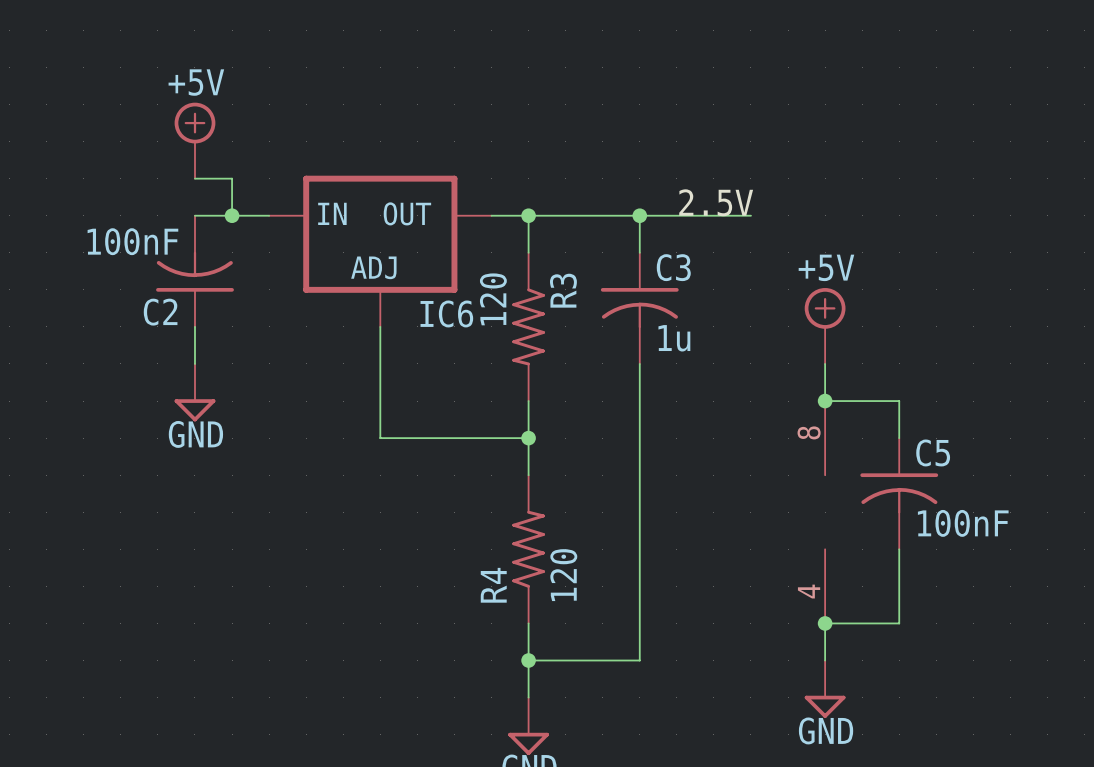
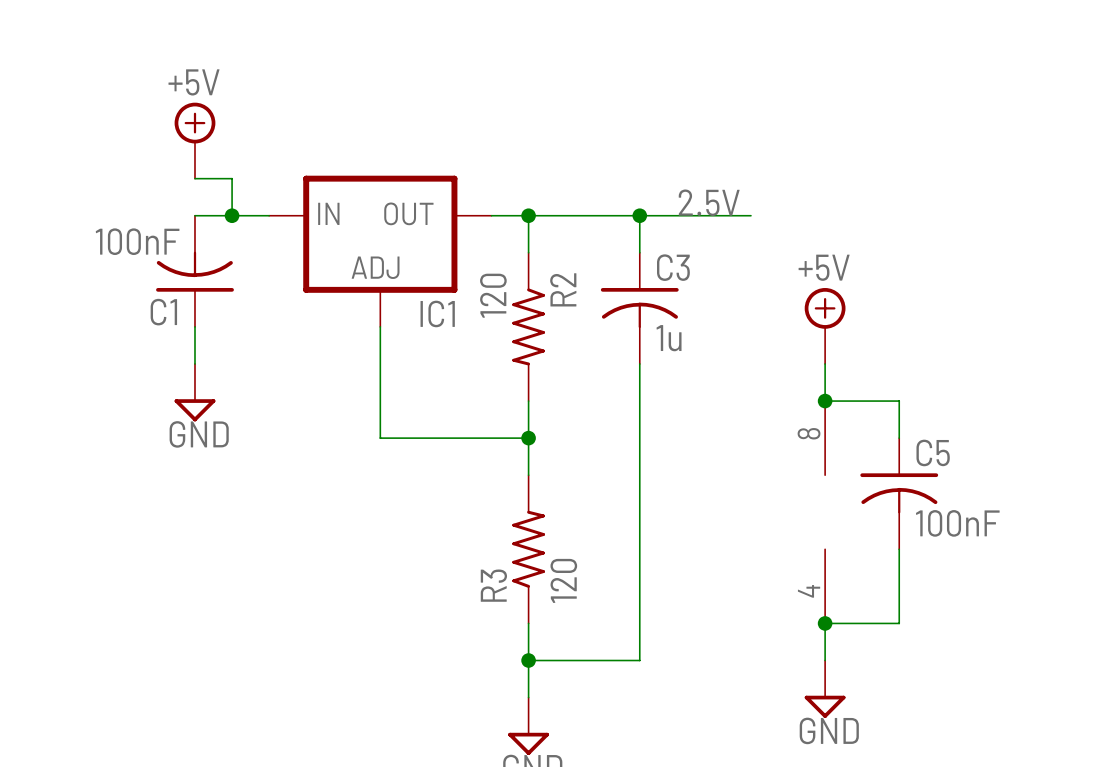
R3 name: R3 (563, 290) -> R2 (563, 289)
C2 name: C2 (160, 312) -> C1 (163, 312)
IC6 name: IC6 (446, 313) -> IC1 (437, 313)
R4 name: R4 (493, 585) -> R3 (493, 585)

